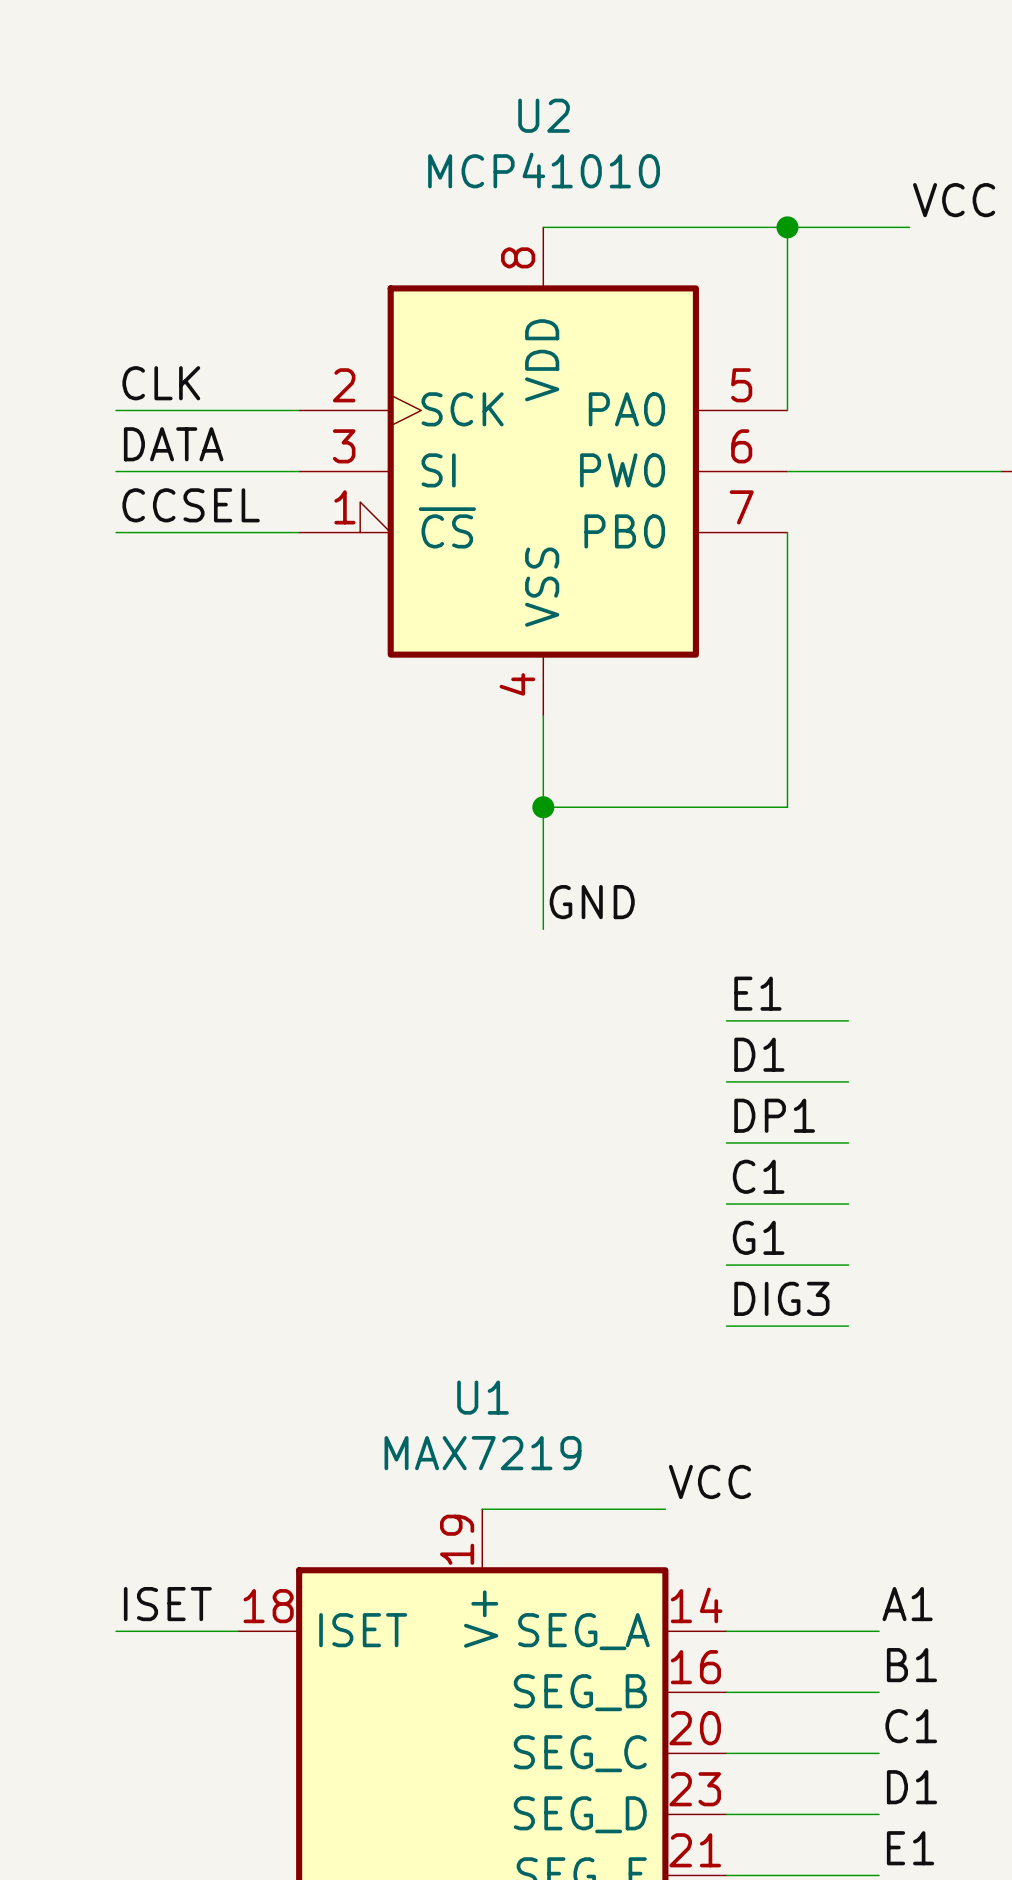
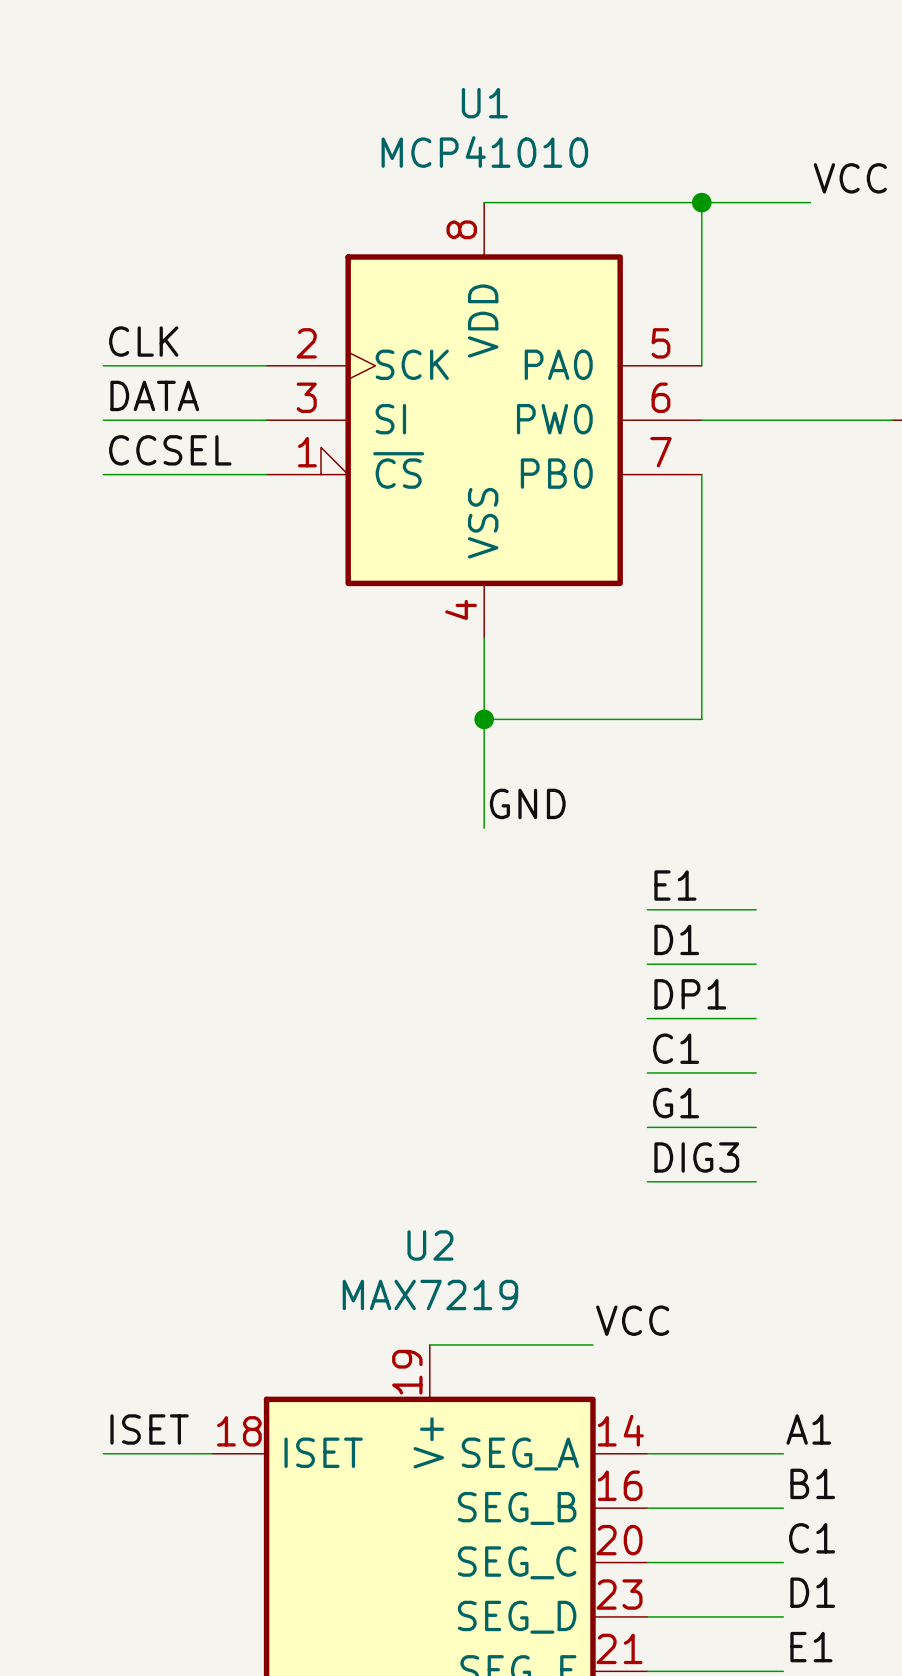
U2 name: U2 (544, 115) -> U1 (484, 103)
U1 name: U1 (482, 1397) -> U2 (430, 1245)

